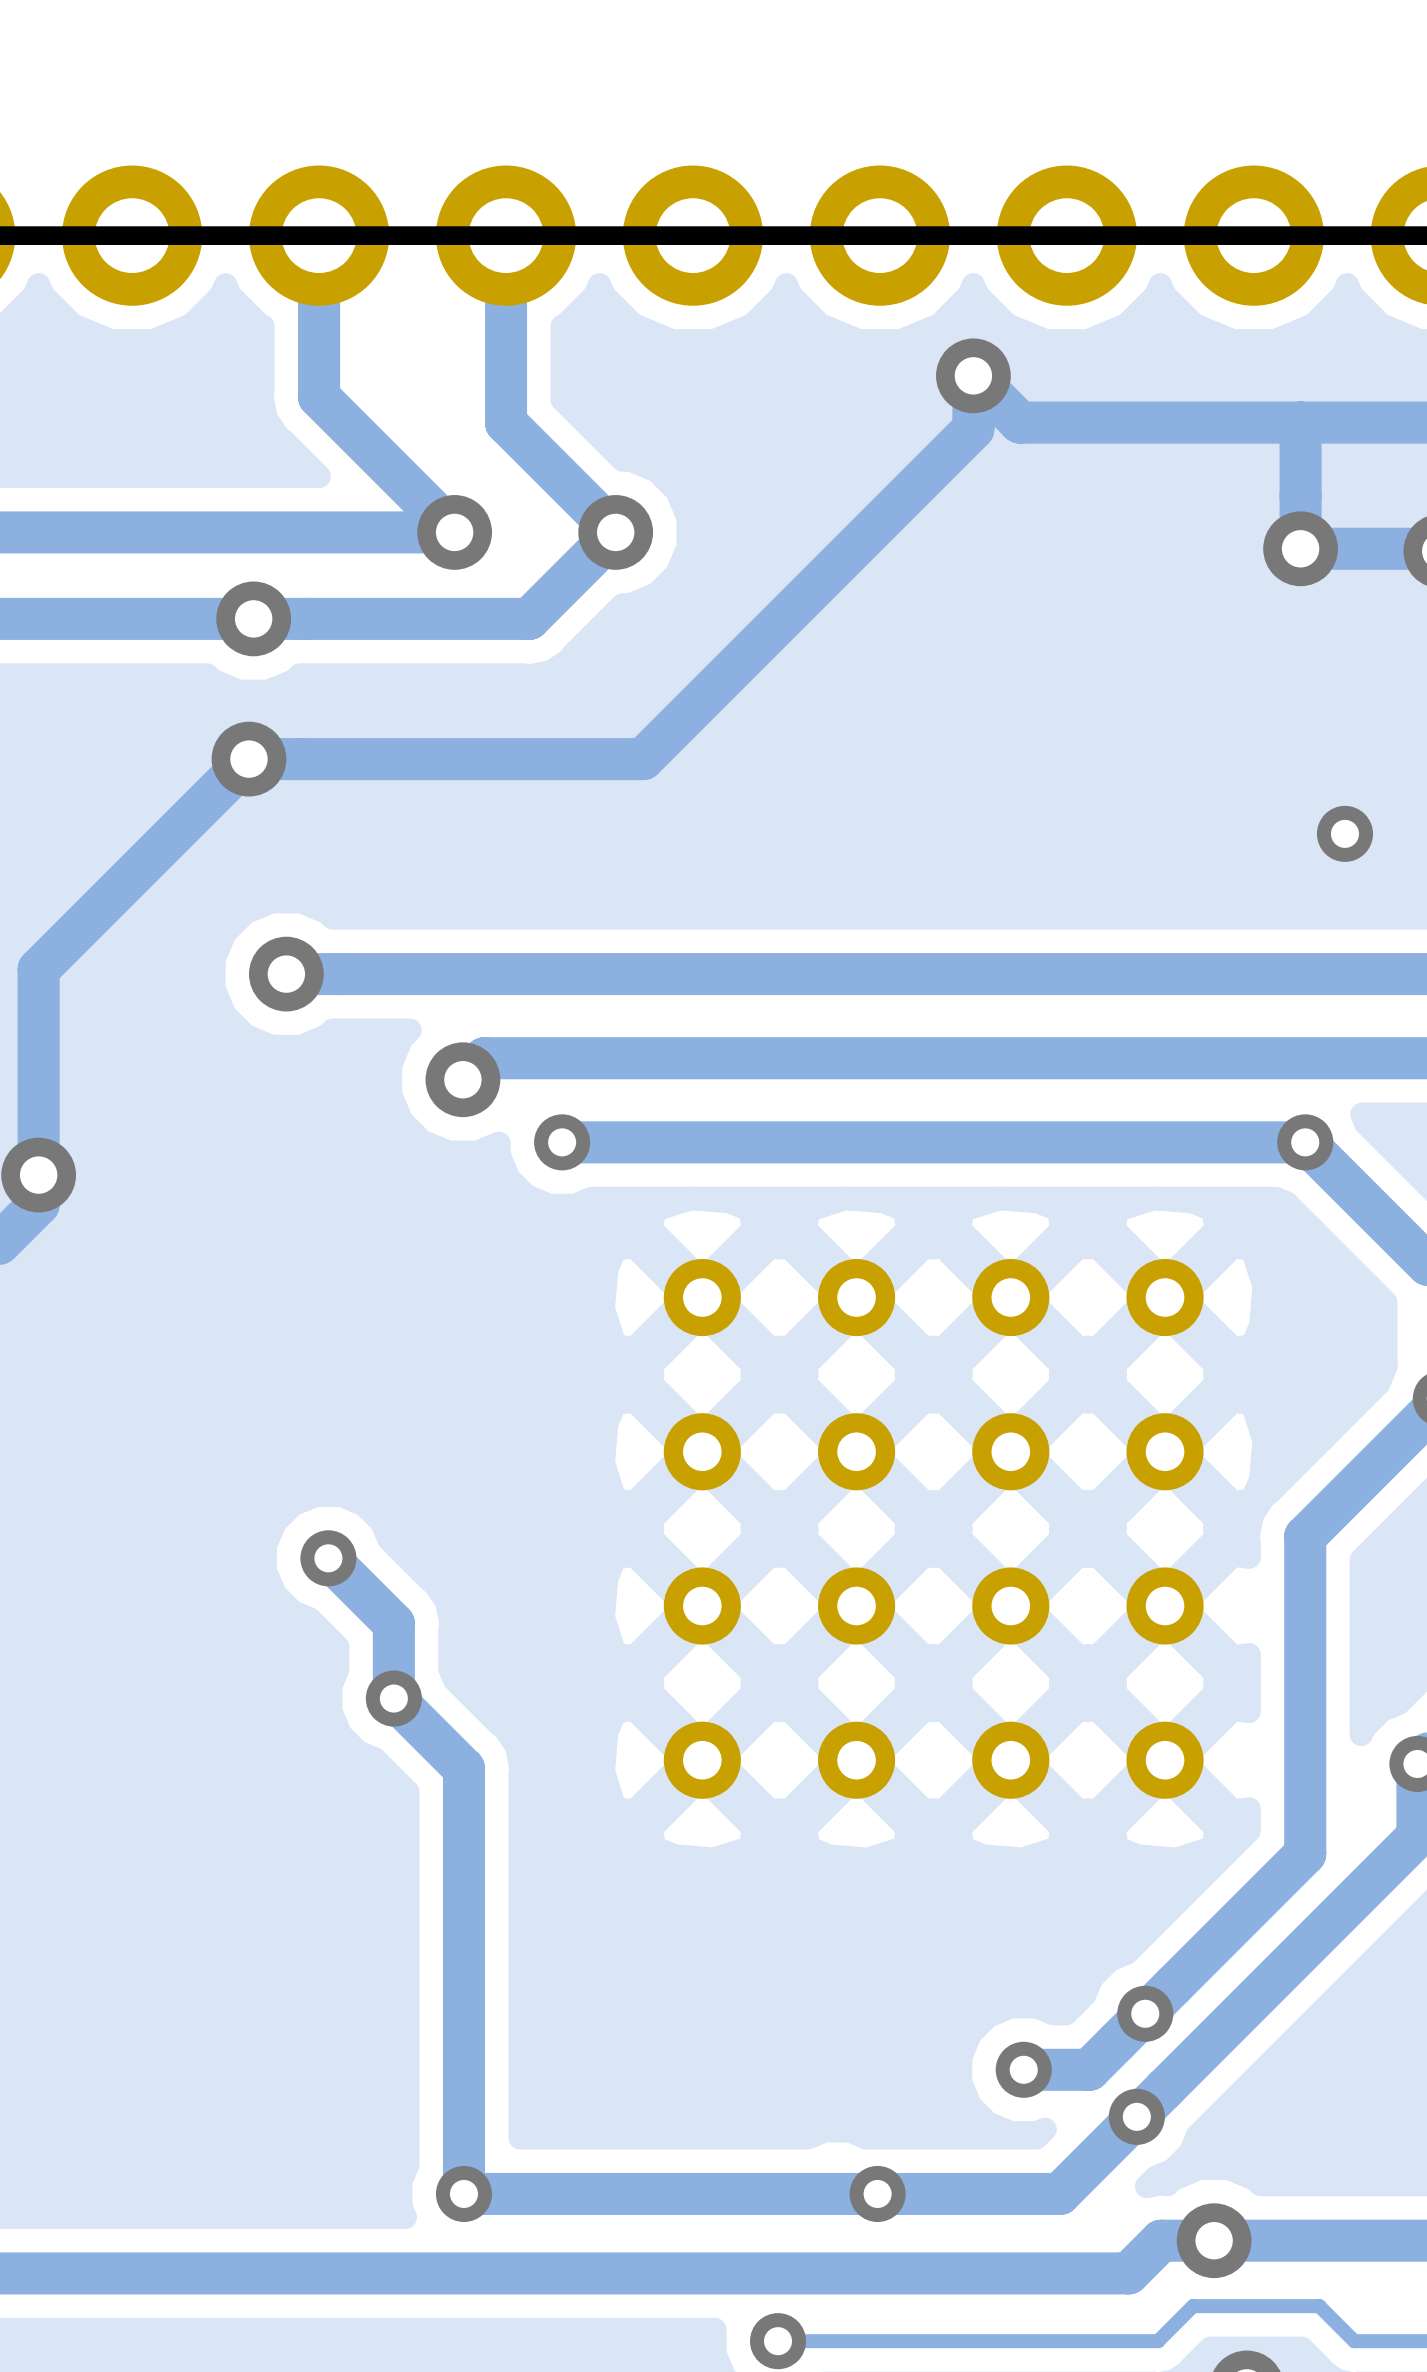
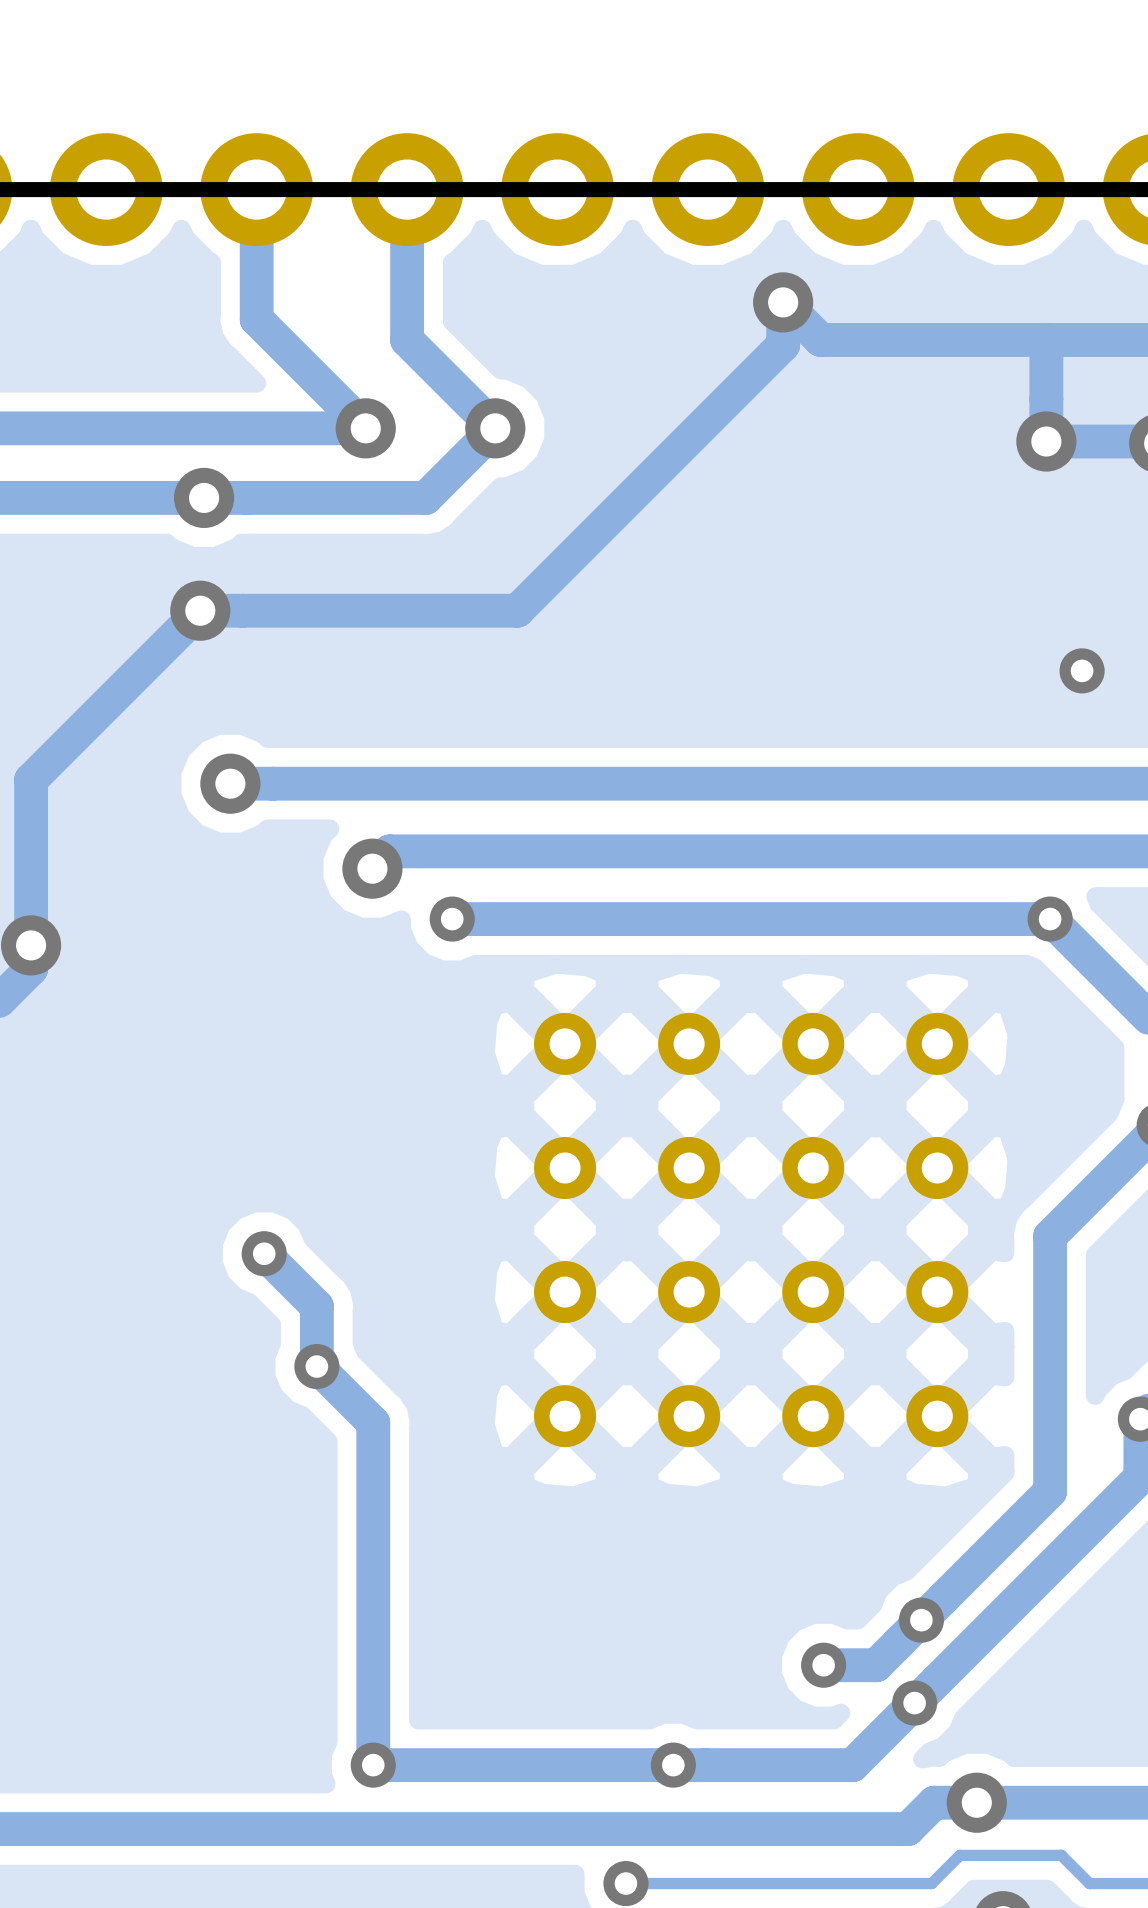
via position: (877, 2193) -> (673, 1765)

